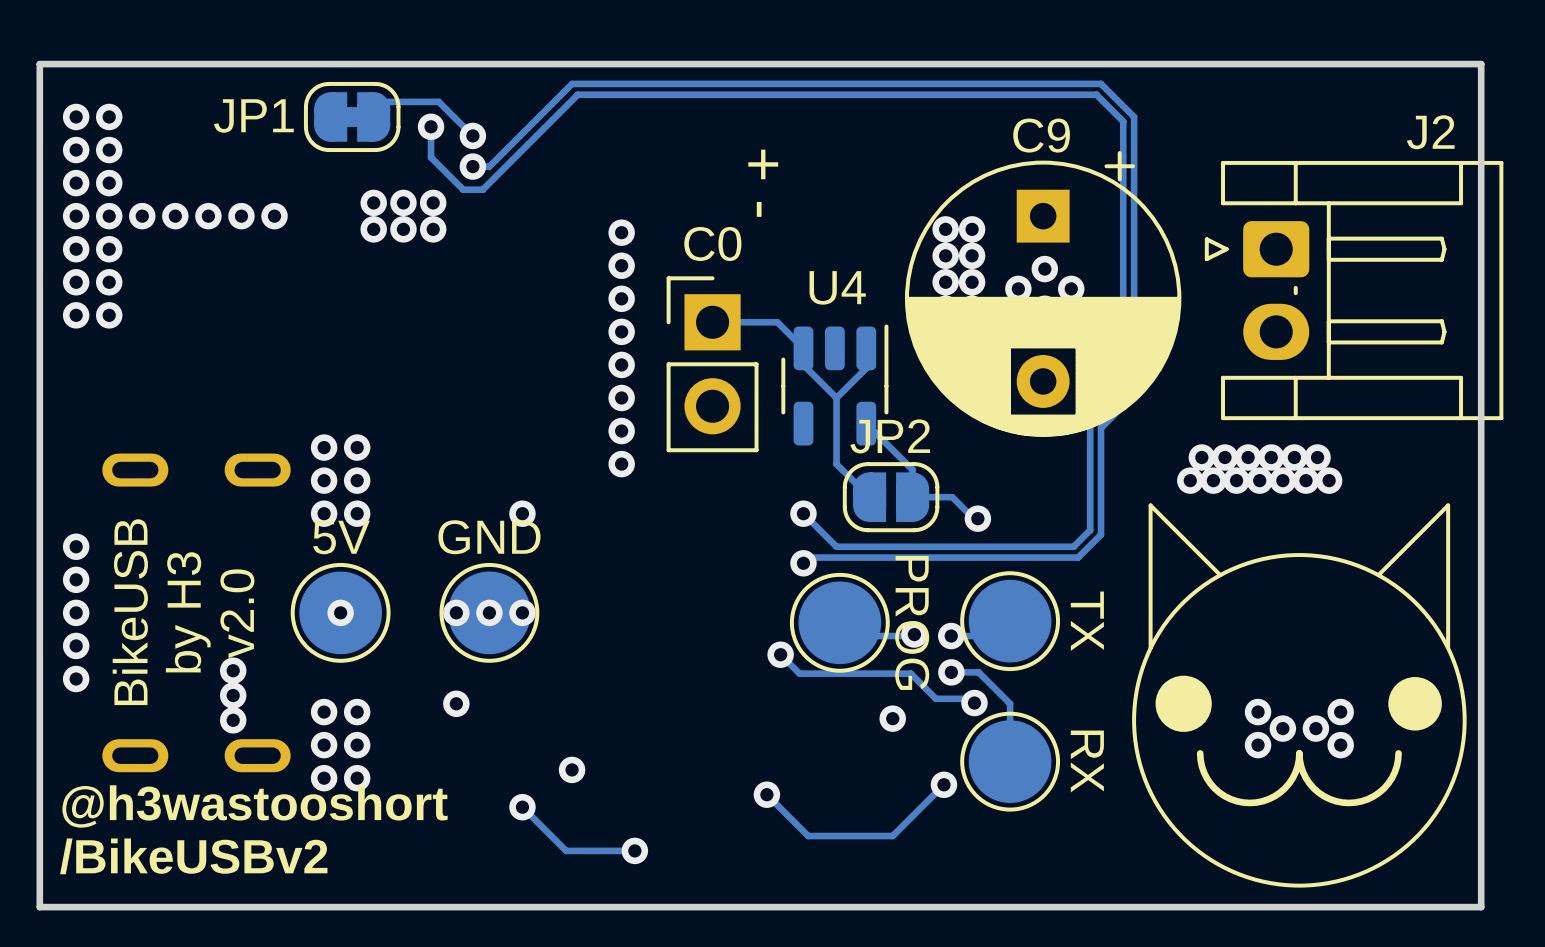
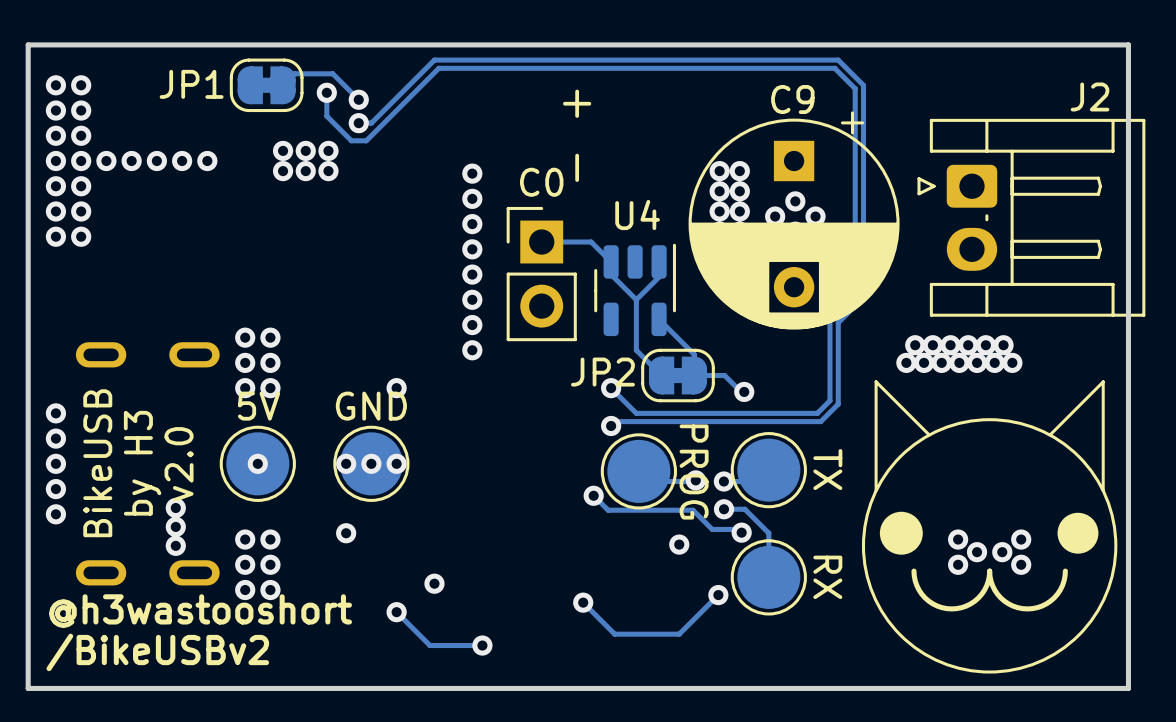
JP2 name position: JP2 (890, 436) -> JP2 (602, 372)
JP2 footprint: [842, 462, 940, 533] -> [641, 348, 715, 403]

